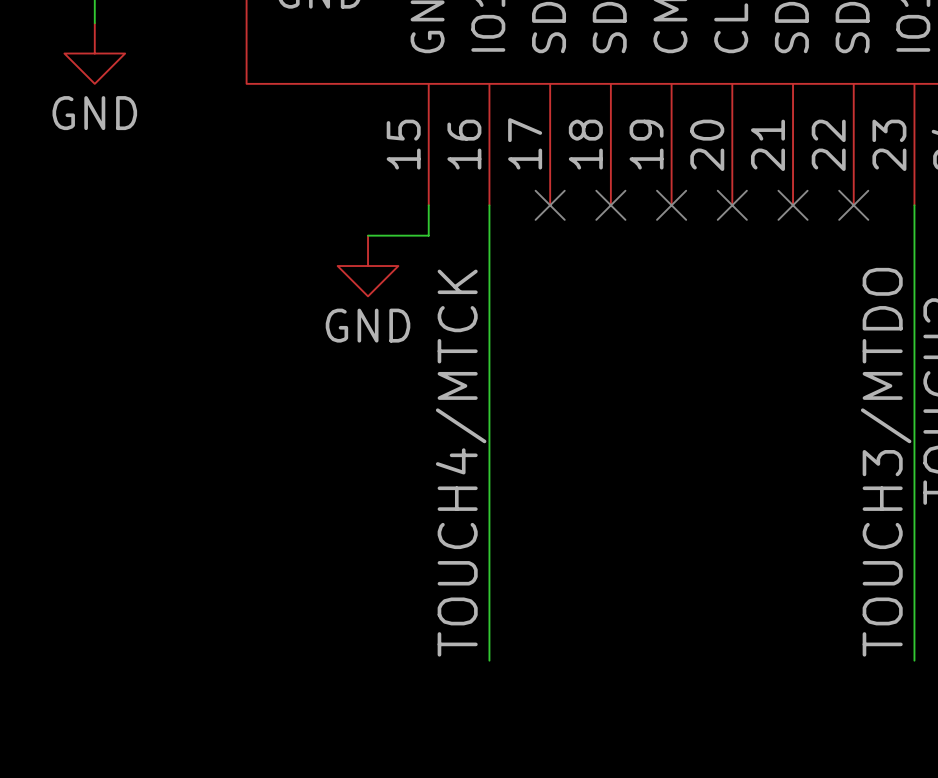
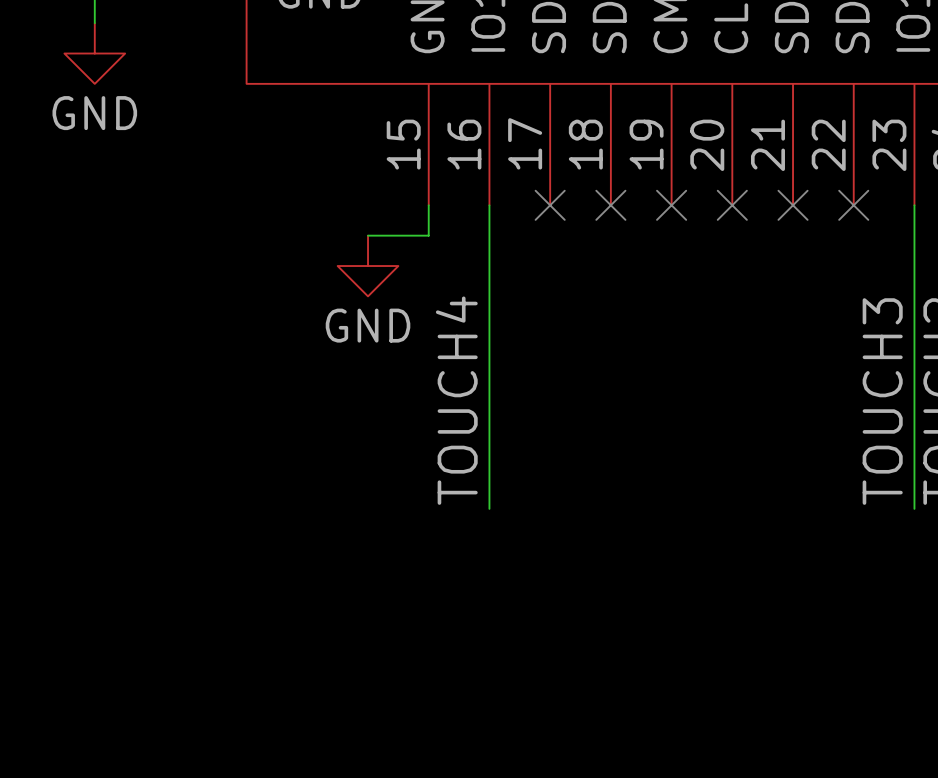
label: TOUCH3/MTDO (886, 462) -> TOUCH3 (882, 401)
label: TOUCH4/MTCK (461, 463) -> TOUCH4 (456, 400)
wire: (489, 508) (489, 660) -> none
wire: (914, 508) (914, 660) -> none

